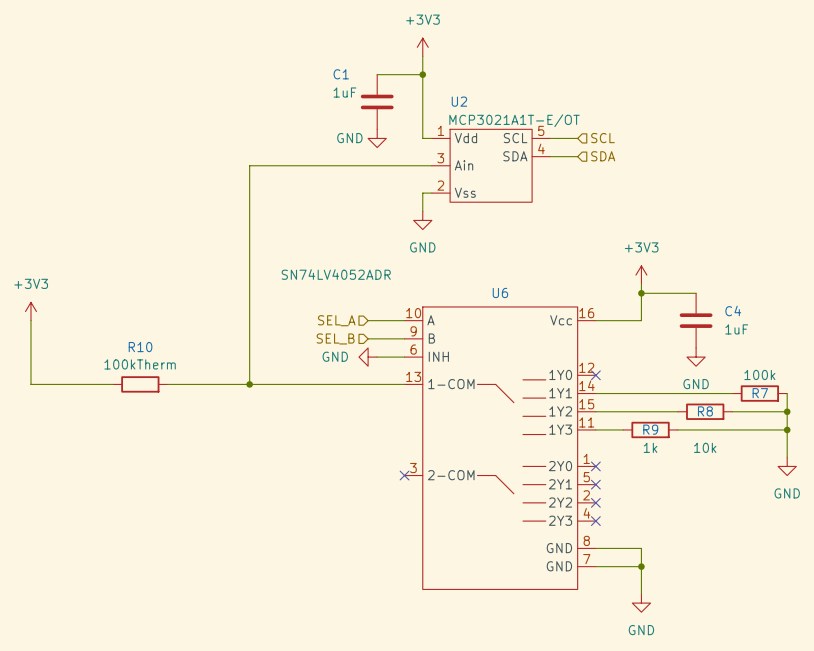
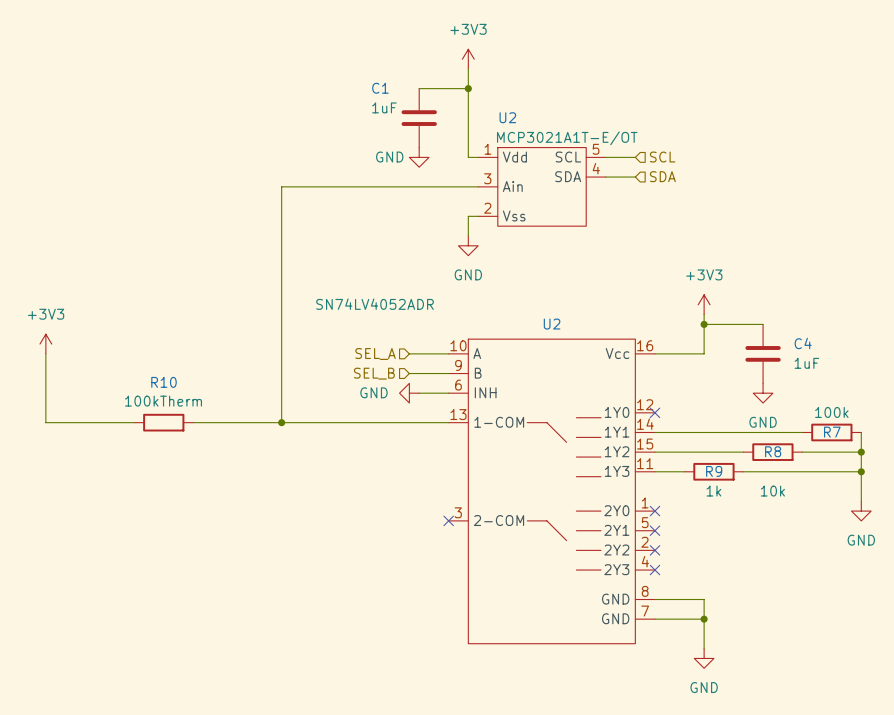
U6 name: U6 (500, 292) -> U2 (552, 324)

